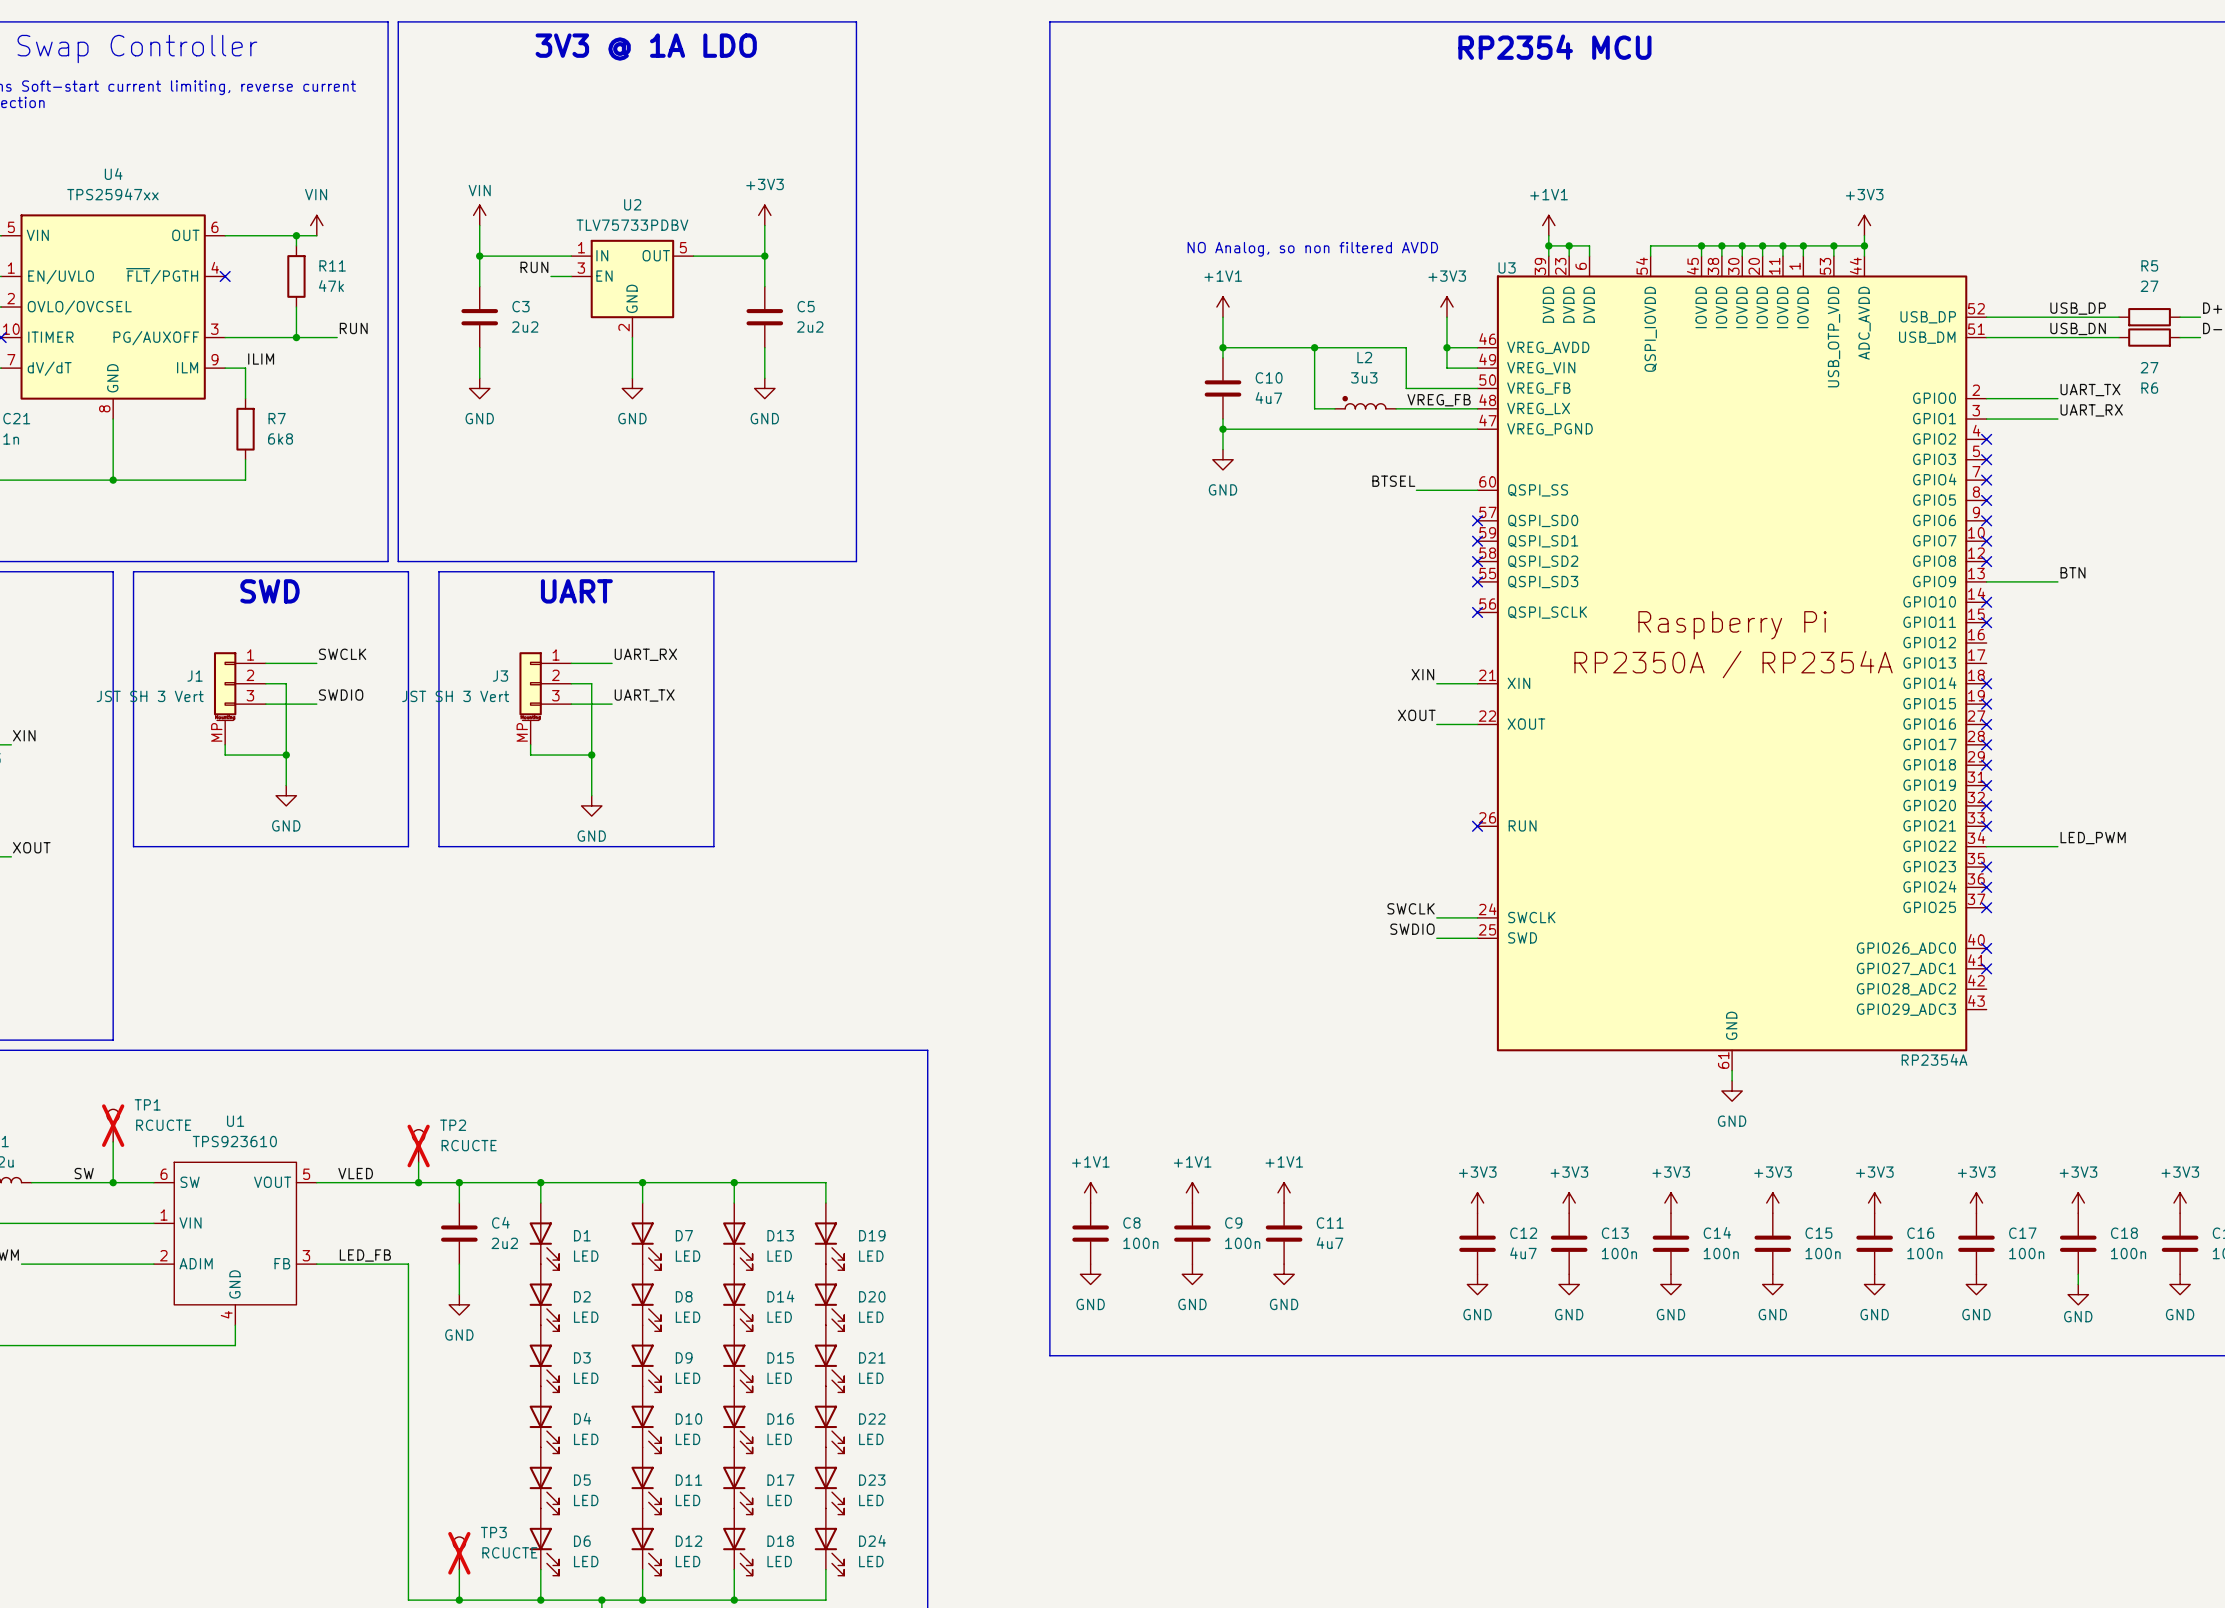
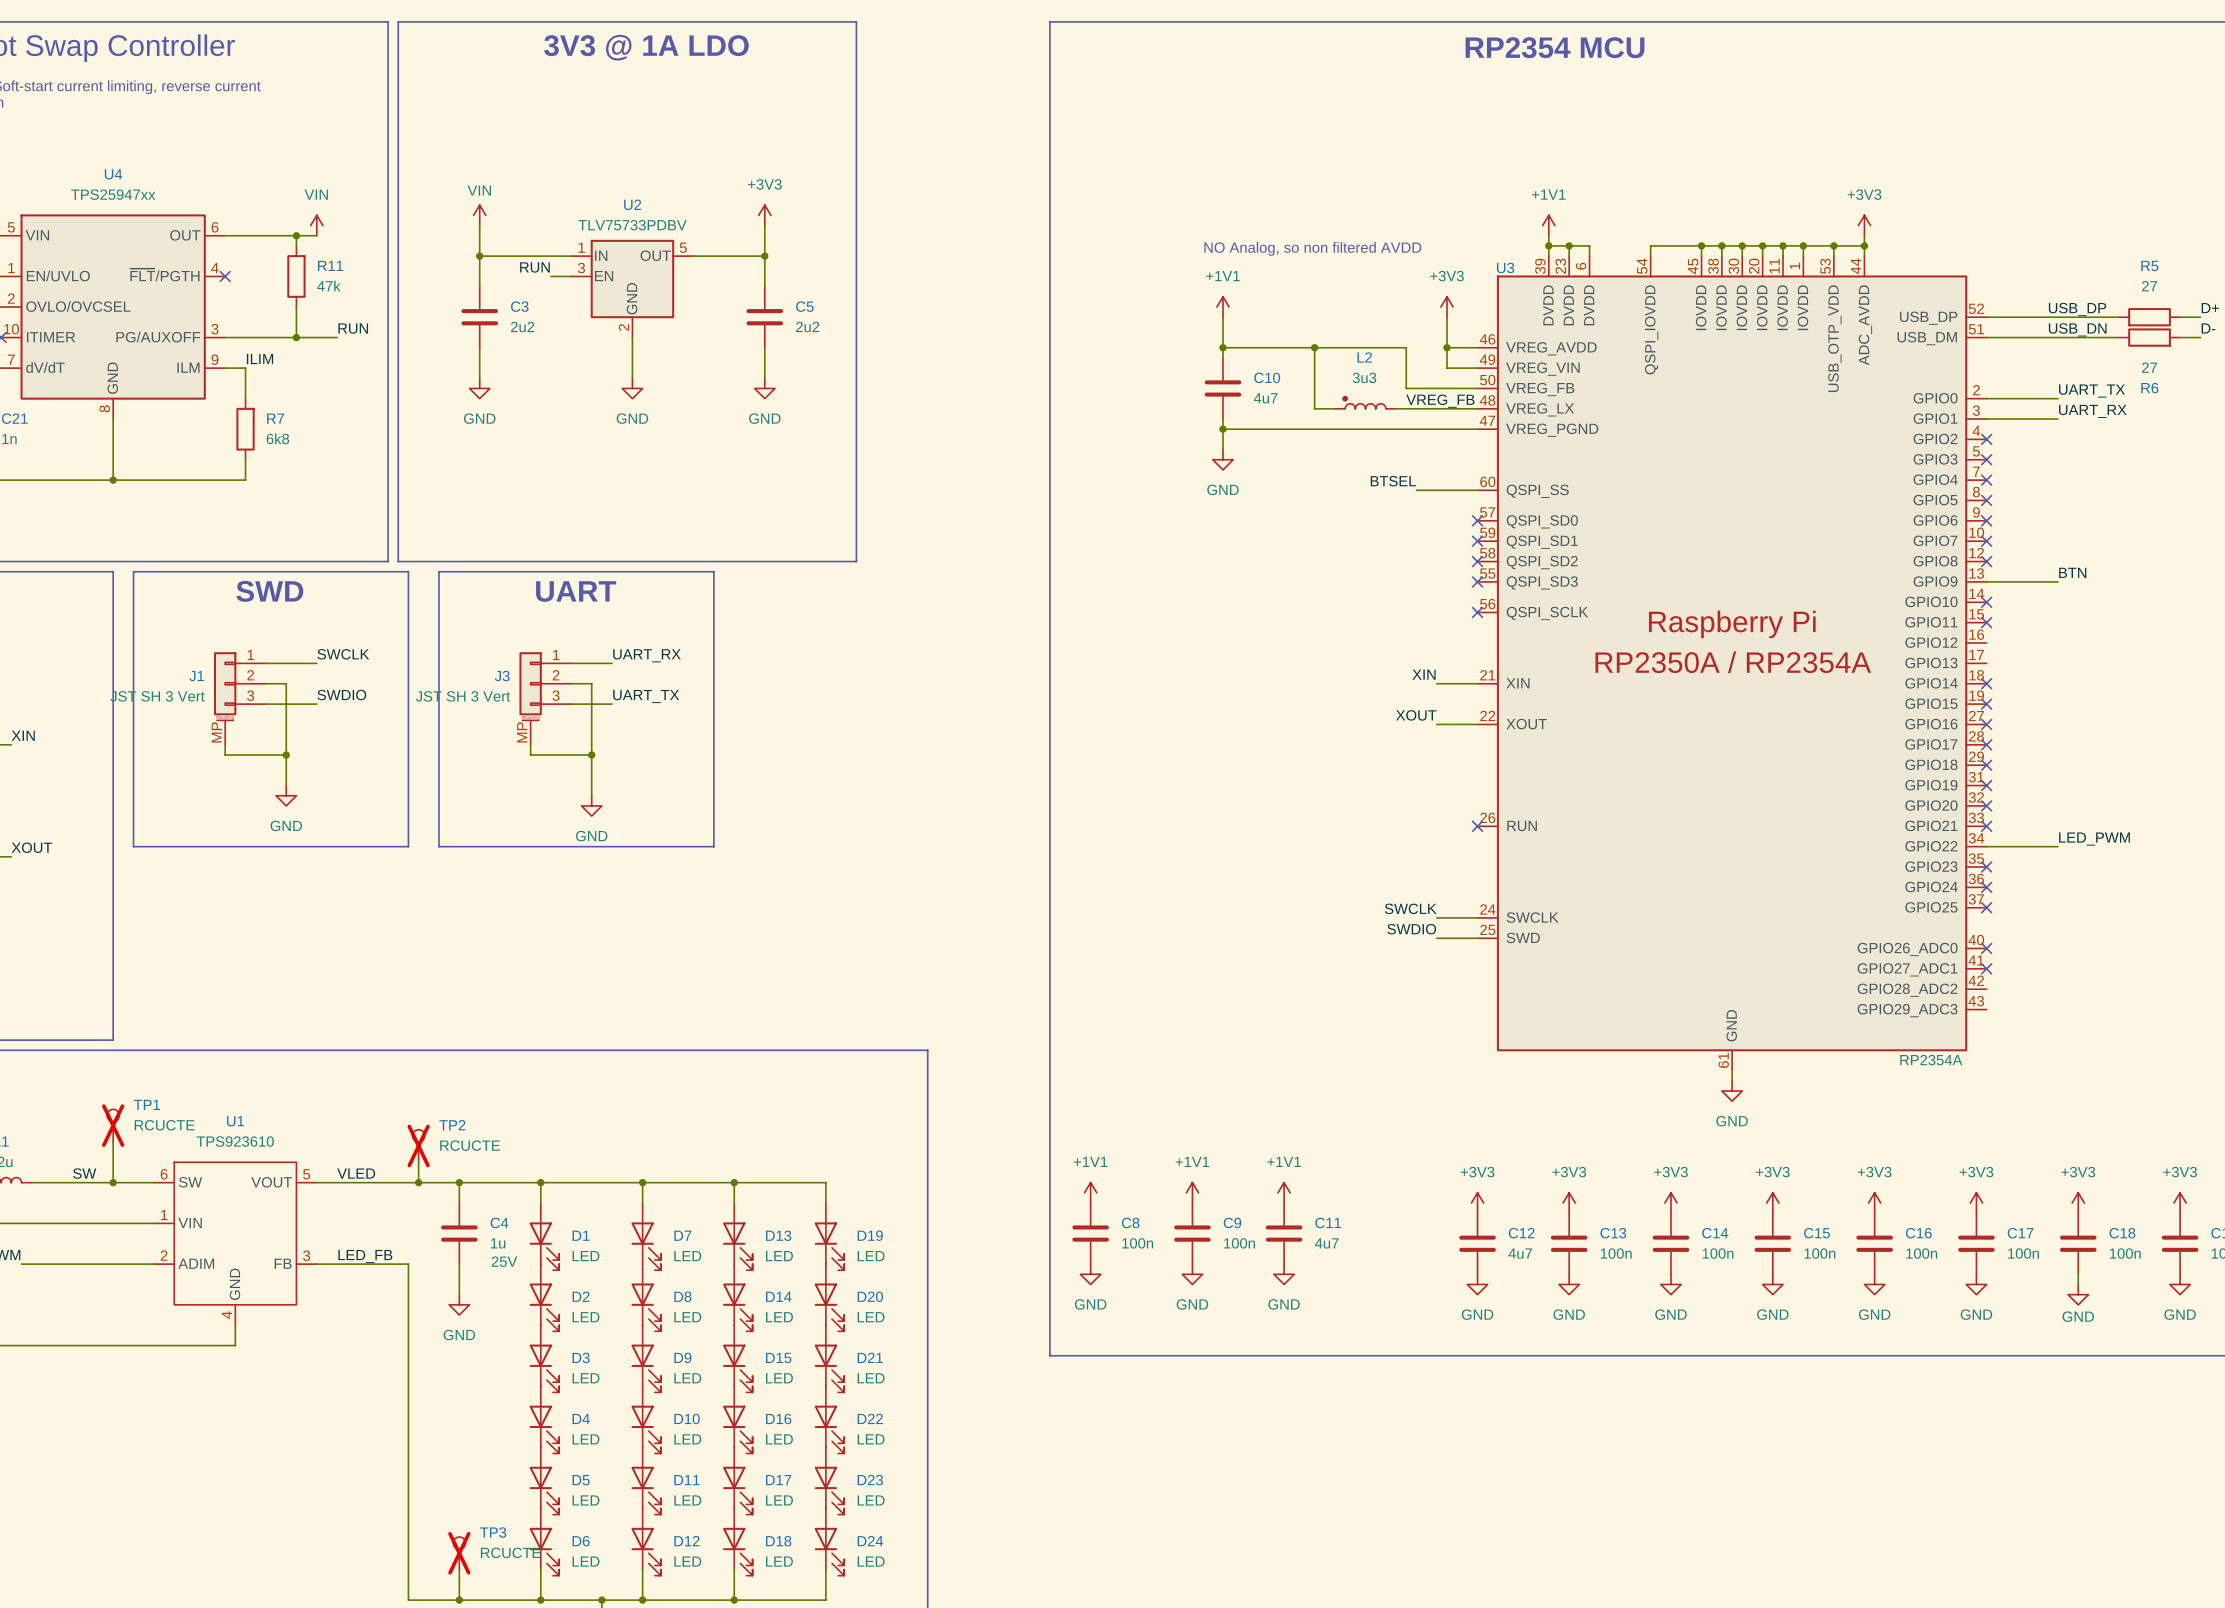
C4 value: 2u2 (504, 1243) -> 1u (498, 1243)
C4 text: none -> 25V (504, 1261)

